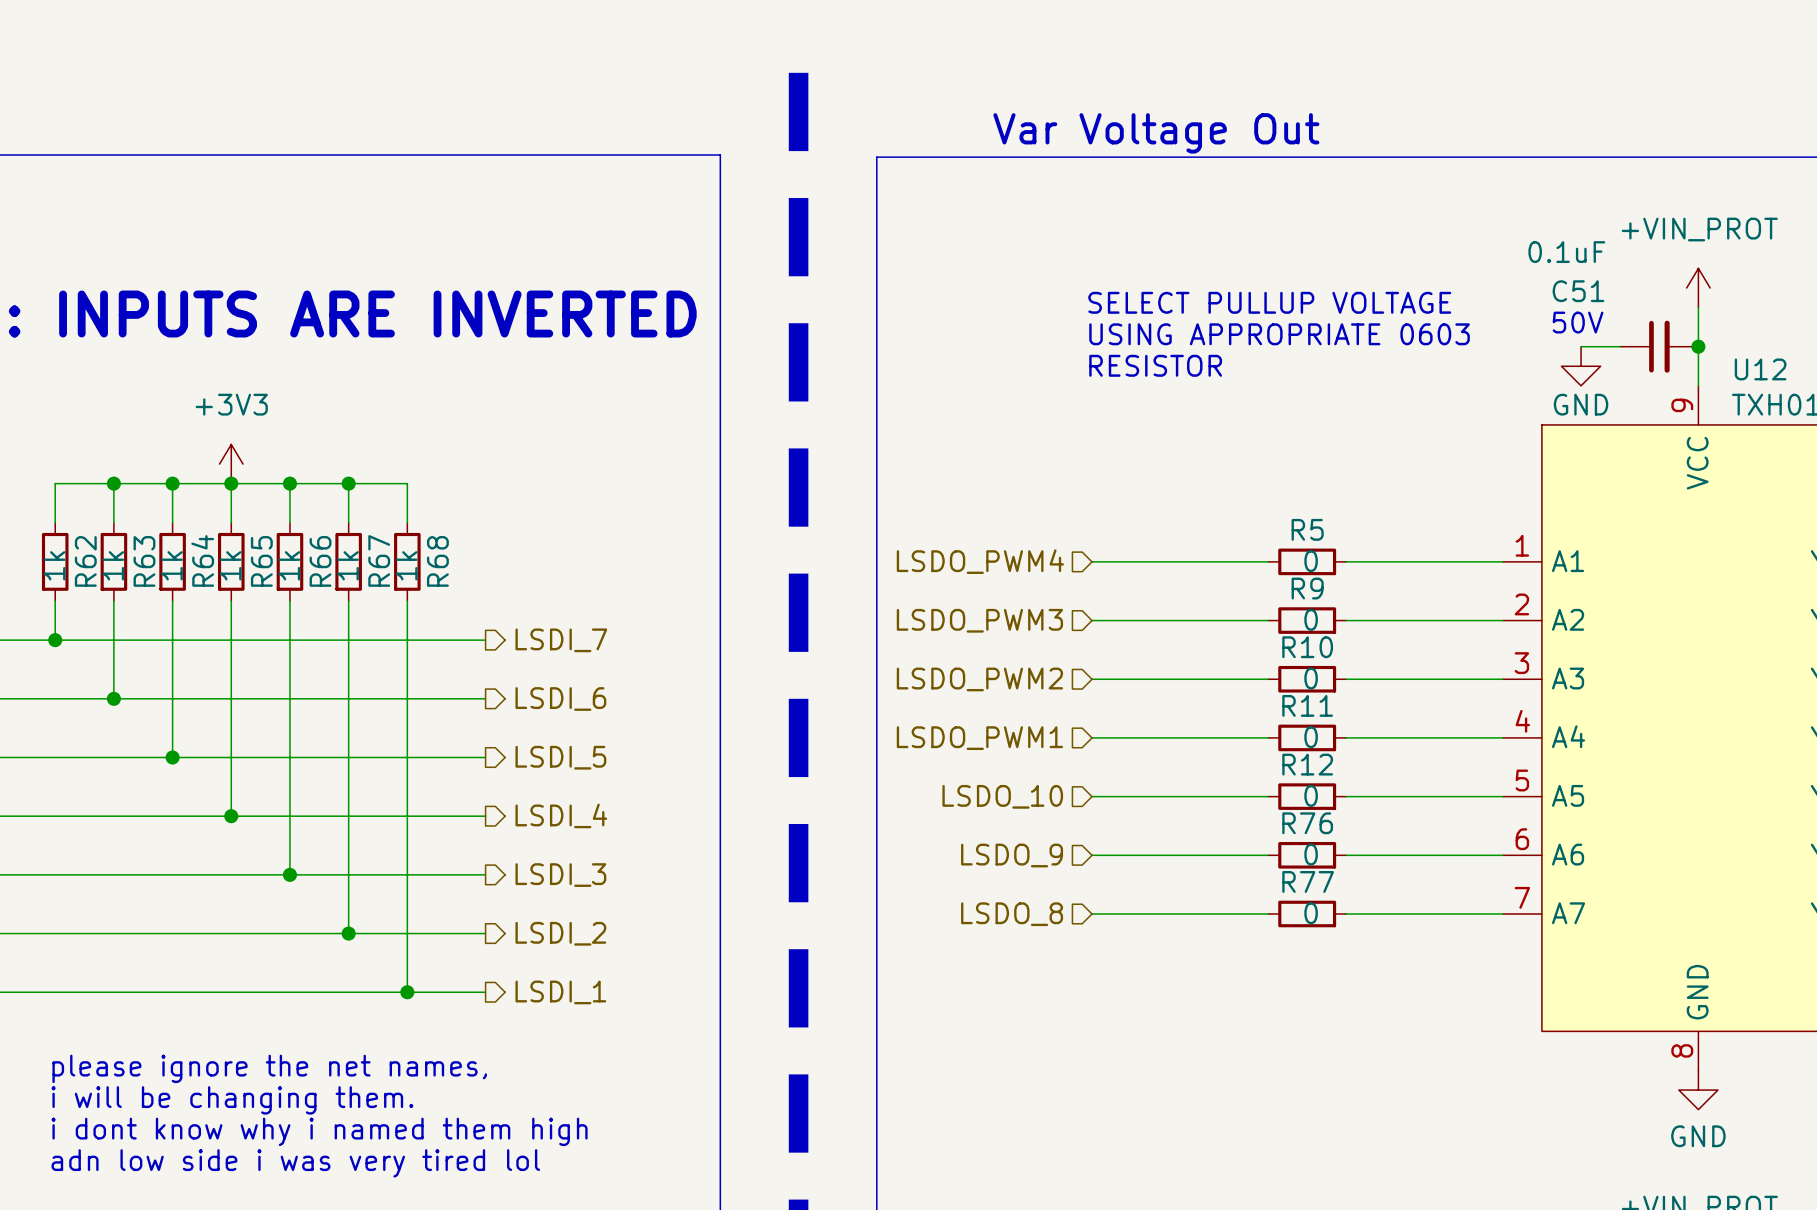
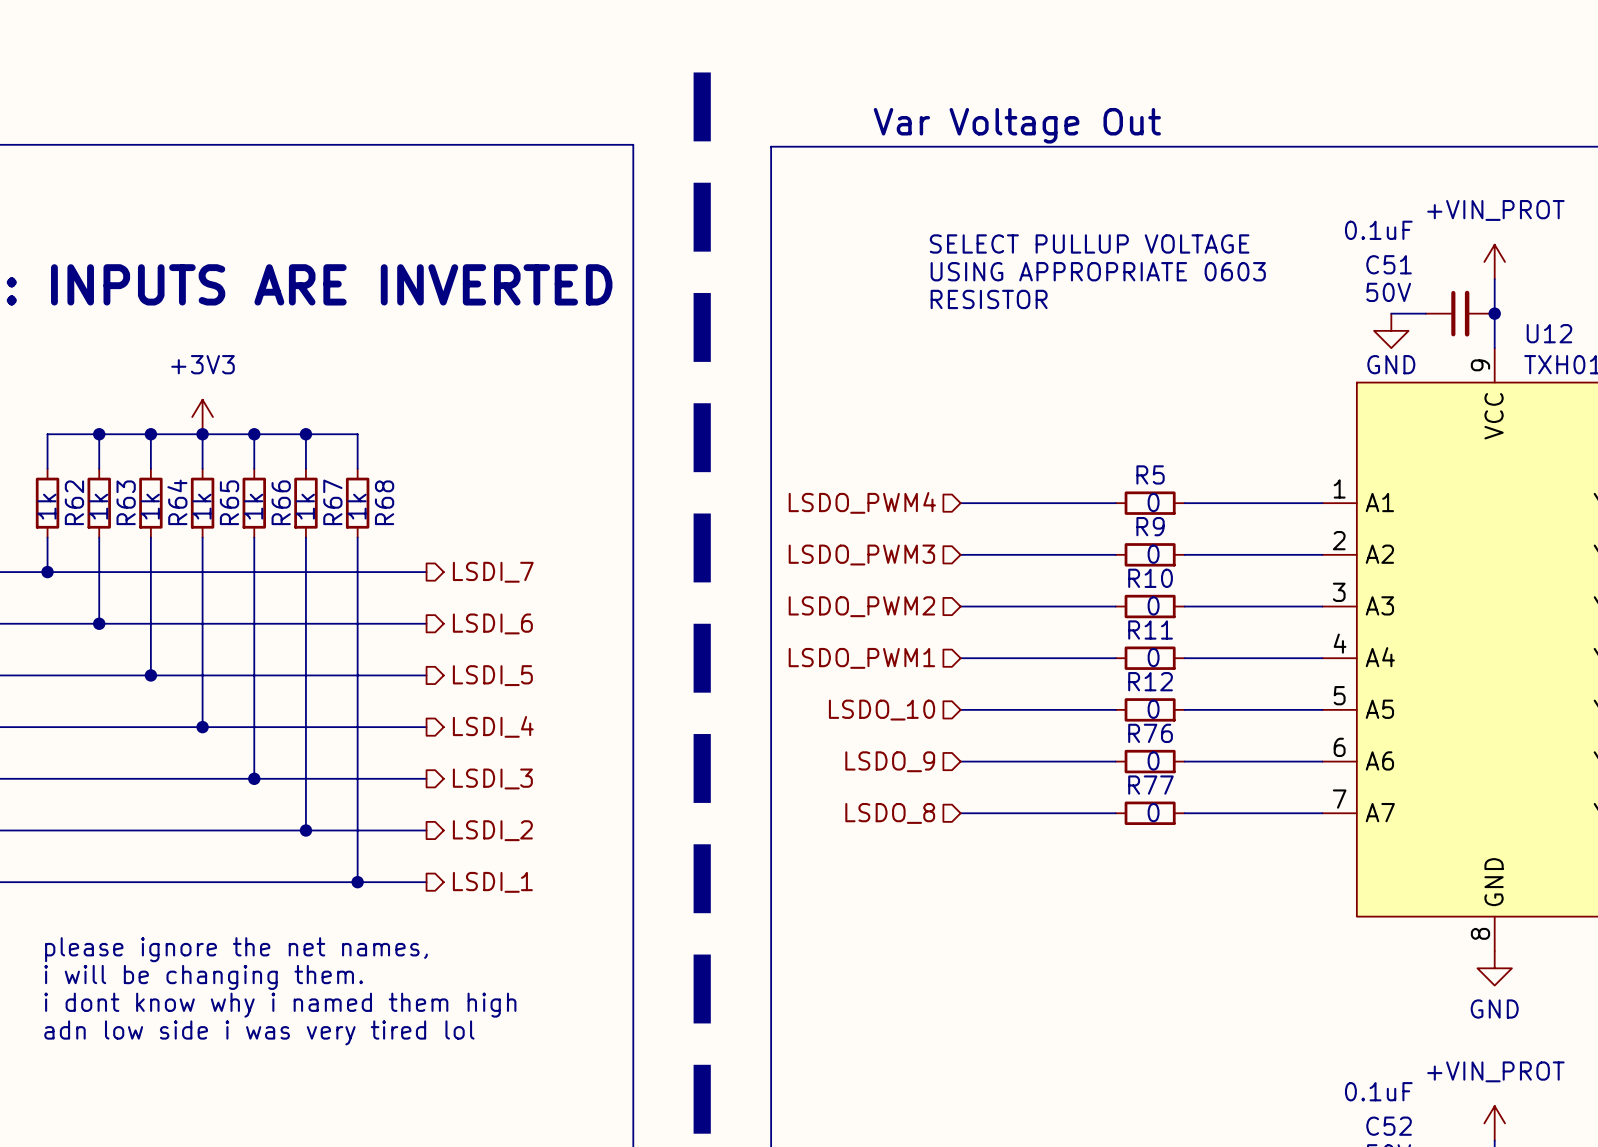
text position: SELECT PULLUP VOLTAGE (1269, 302) -> SELECT PULLUP VOLTAGE (1089, 243)
text position: USING APPROPRIATE 0603 (1279, 334) -> USING APPROPRIATE 0603 (1098, 271)
text position: RESISTOR (1155, 365) -> RESISTOR (989, 299)

